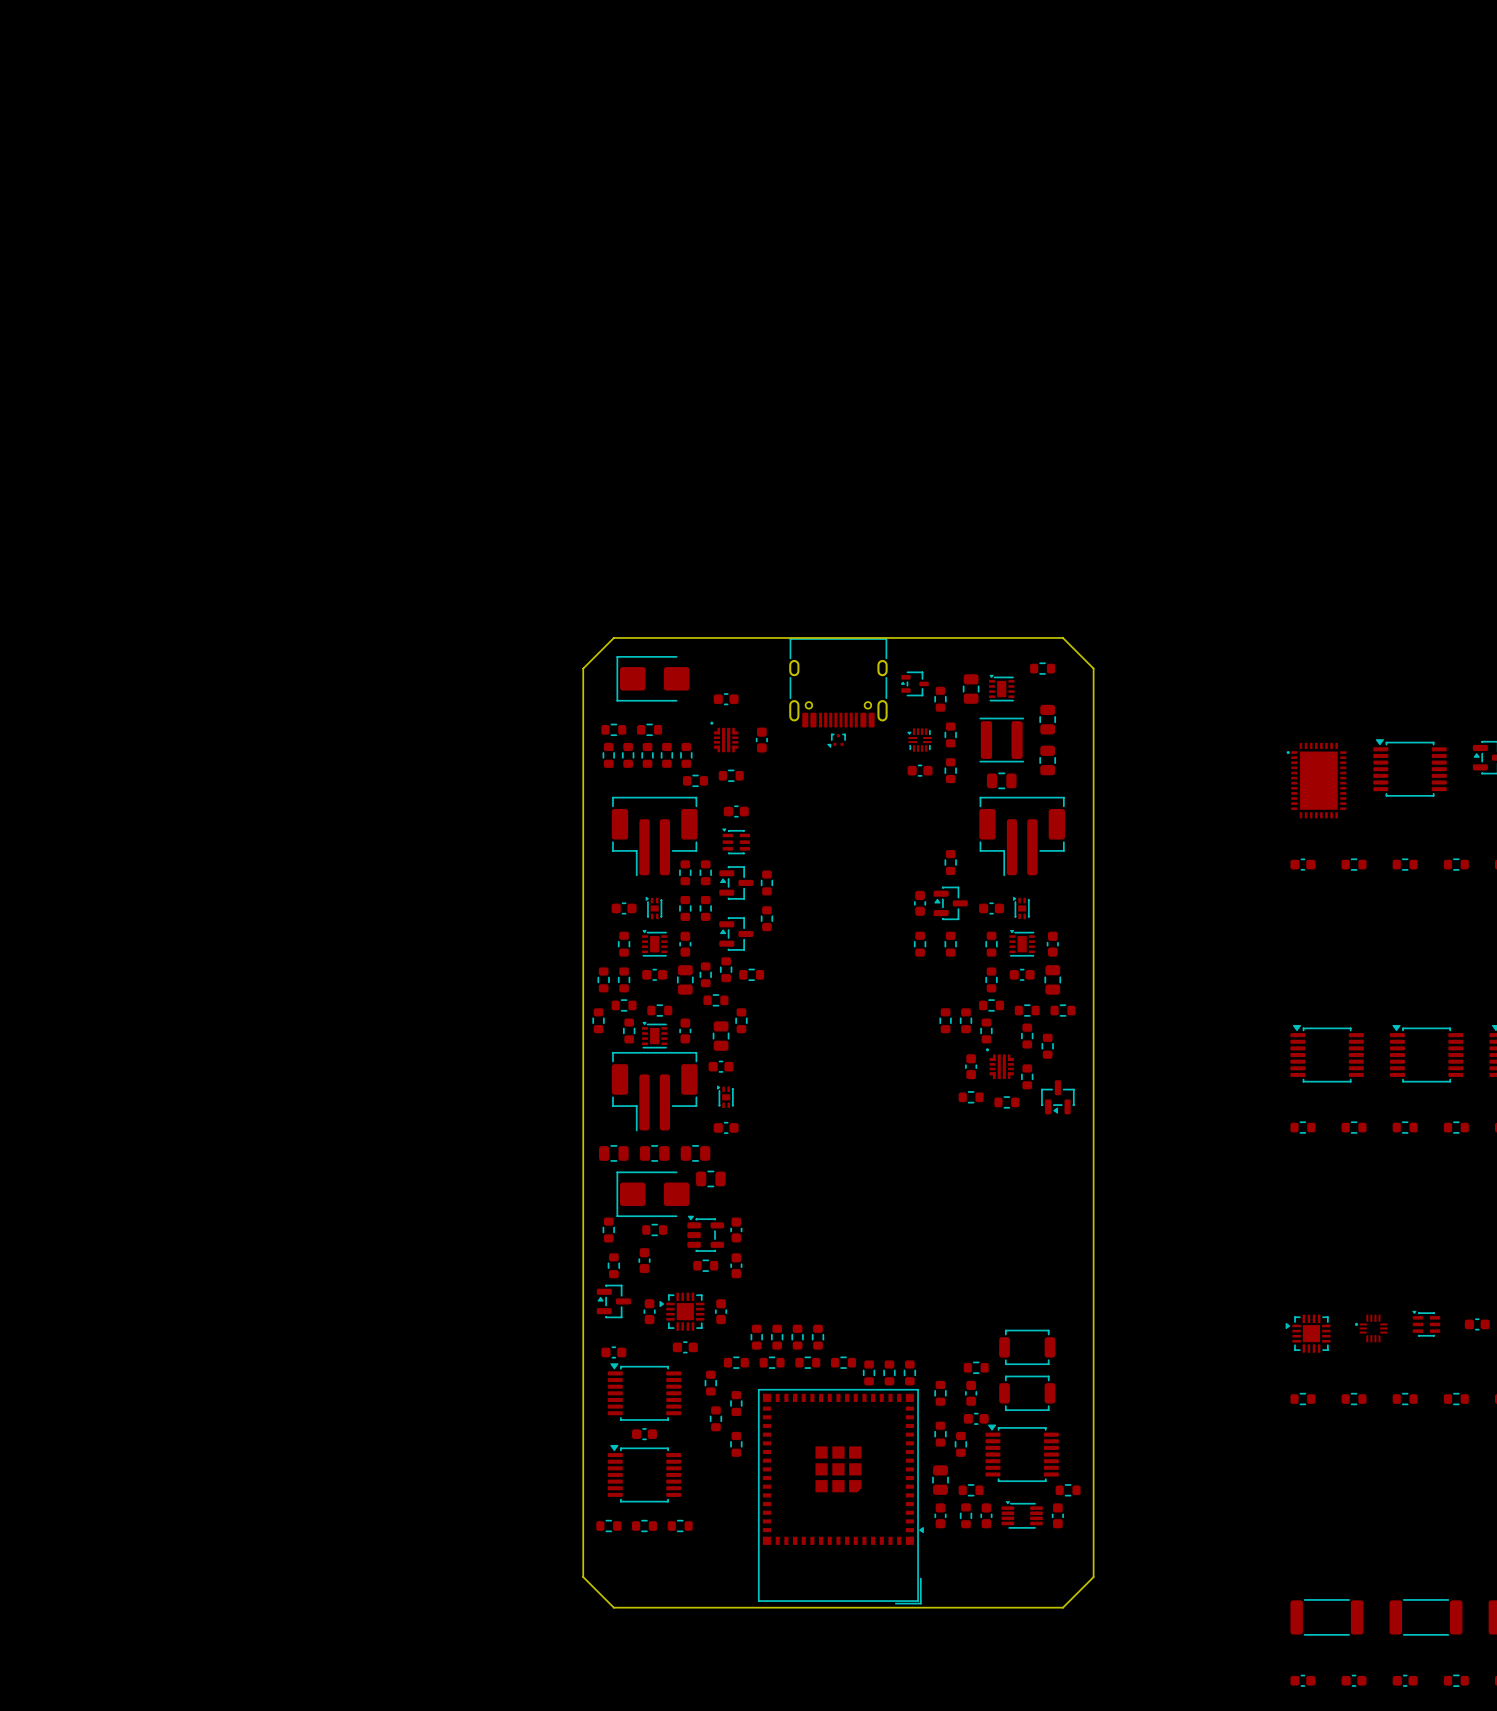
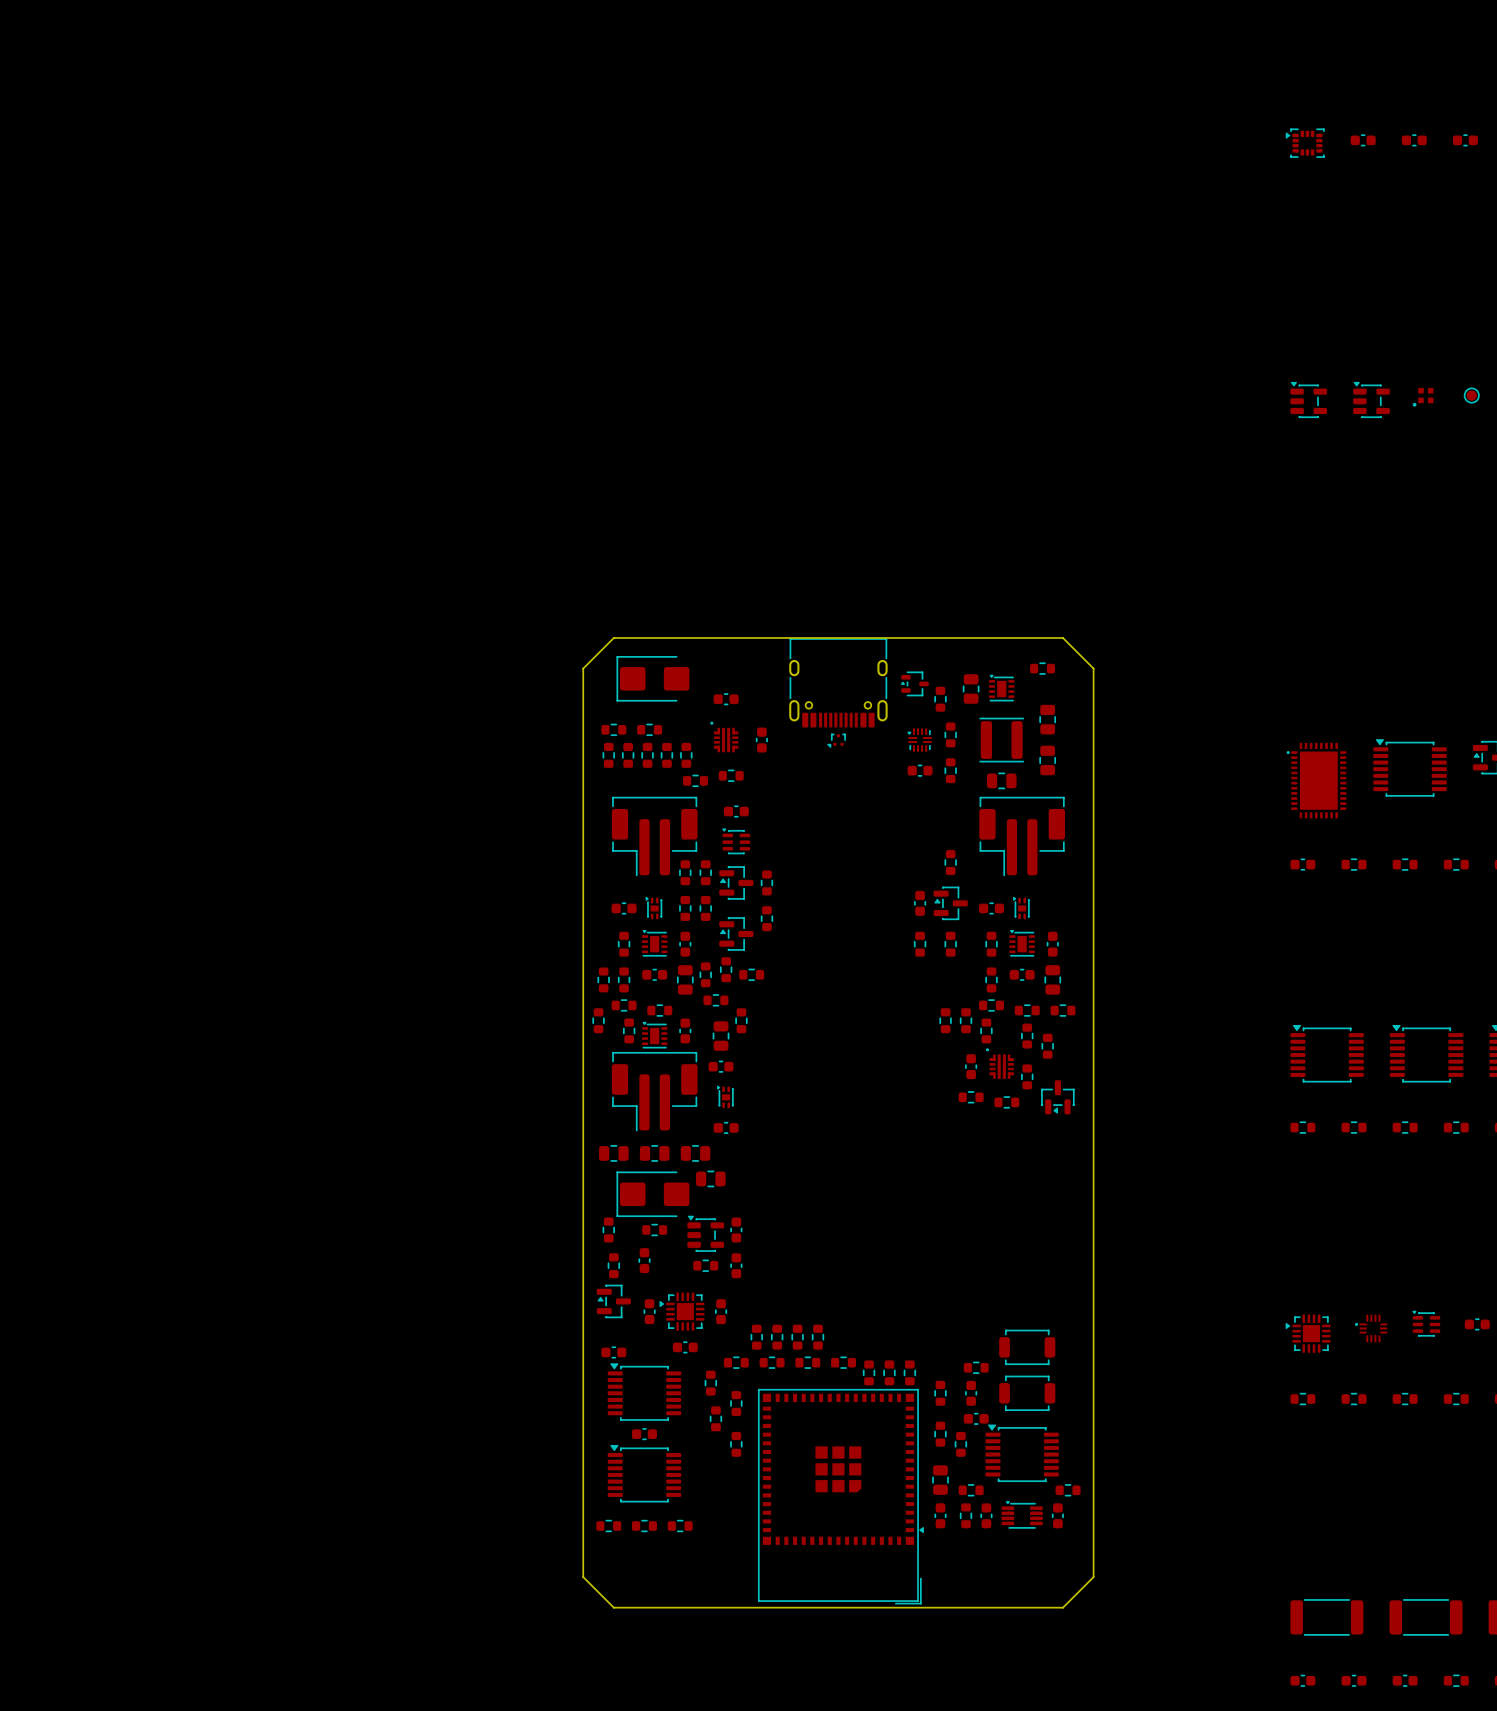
part: none -> (1363, 140)
part: none -> (1414, 140)
part: none -> (1465, 140)
part: none -> (1305, 143)
part: none -> (1471, 395)
part: none -> (1423, 397)
part: none -> (1308, 399)
part: none -> (1371, 399)

